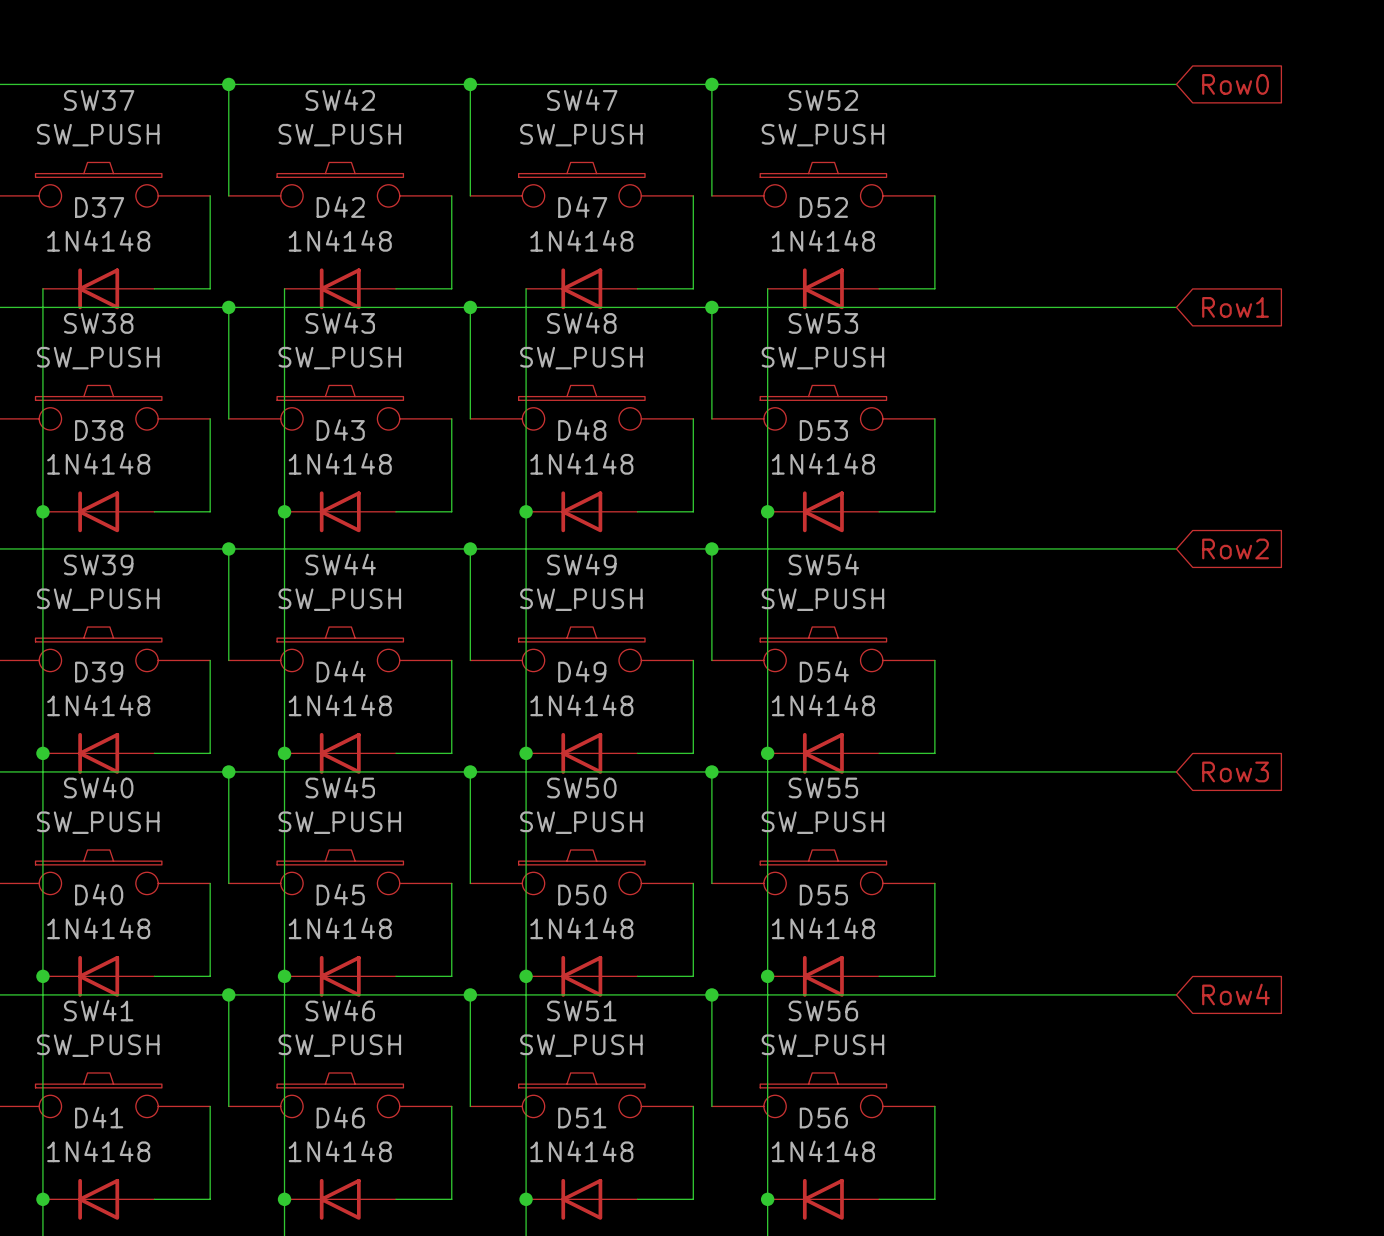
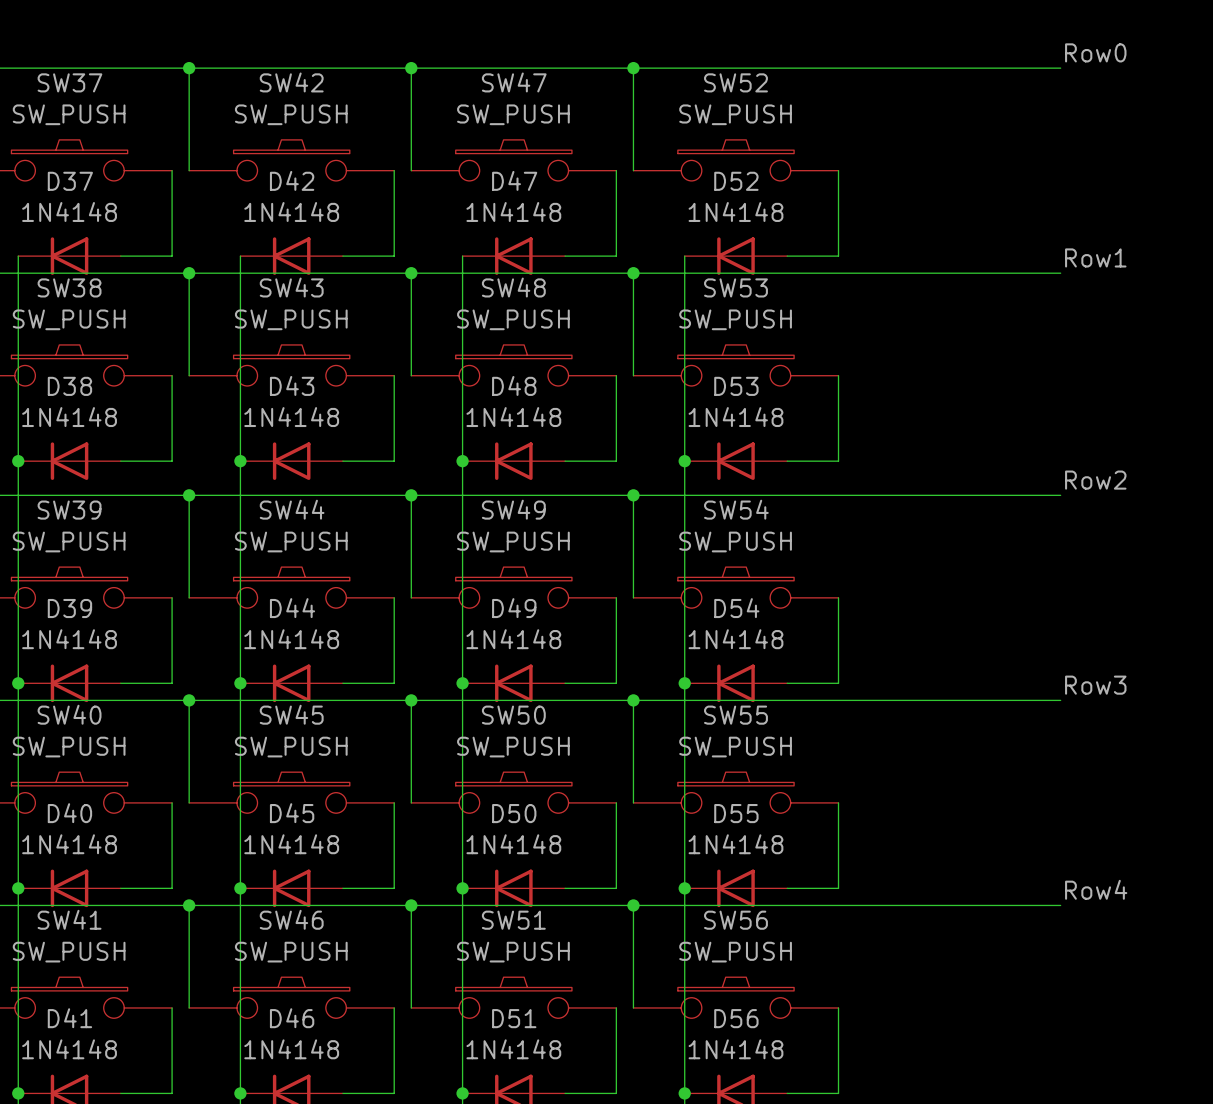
label: none -> Row0 (1095, 52)
global label: Row0 (1235, 84) -> none
label: none -> Row1 (1095, 257)
global label: Row1 (1235, 307) -> none
label: none -> Row2 (1095, 480)
global label: Row2 (1235, 548) -> none
label: none -> Row3 (1095, 685)
global label: Row3 (1235, 771) -> none
label: none -> Row4 (1096, 889)
global label: Row4 (1235, 994) -> none

